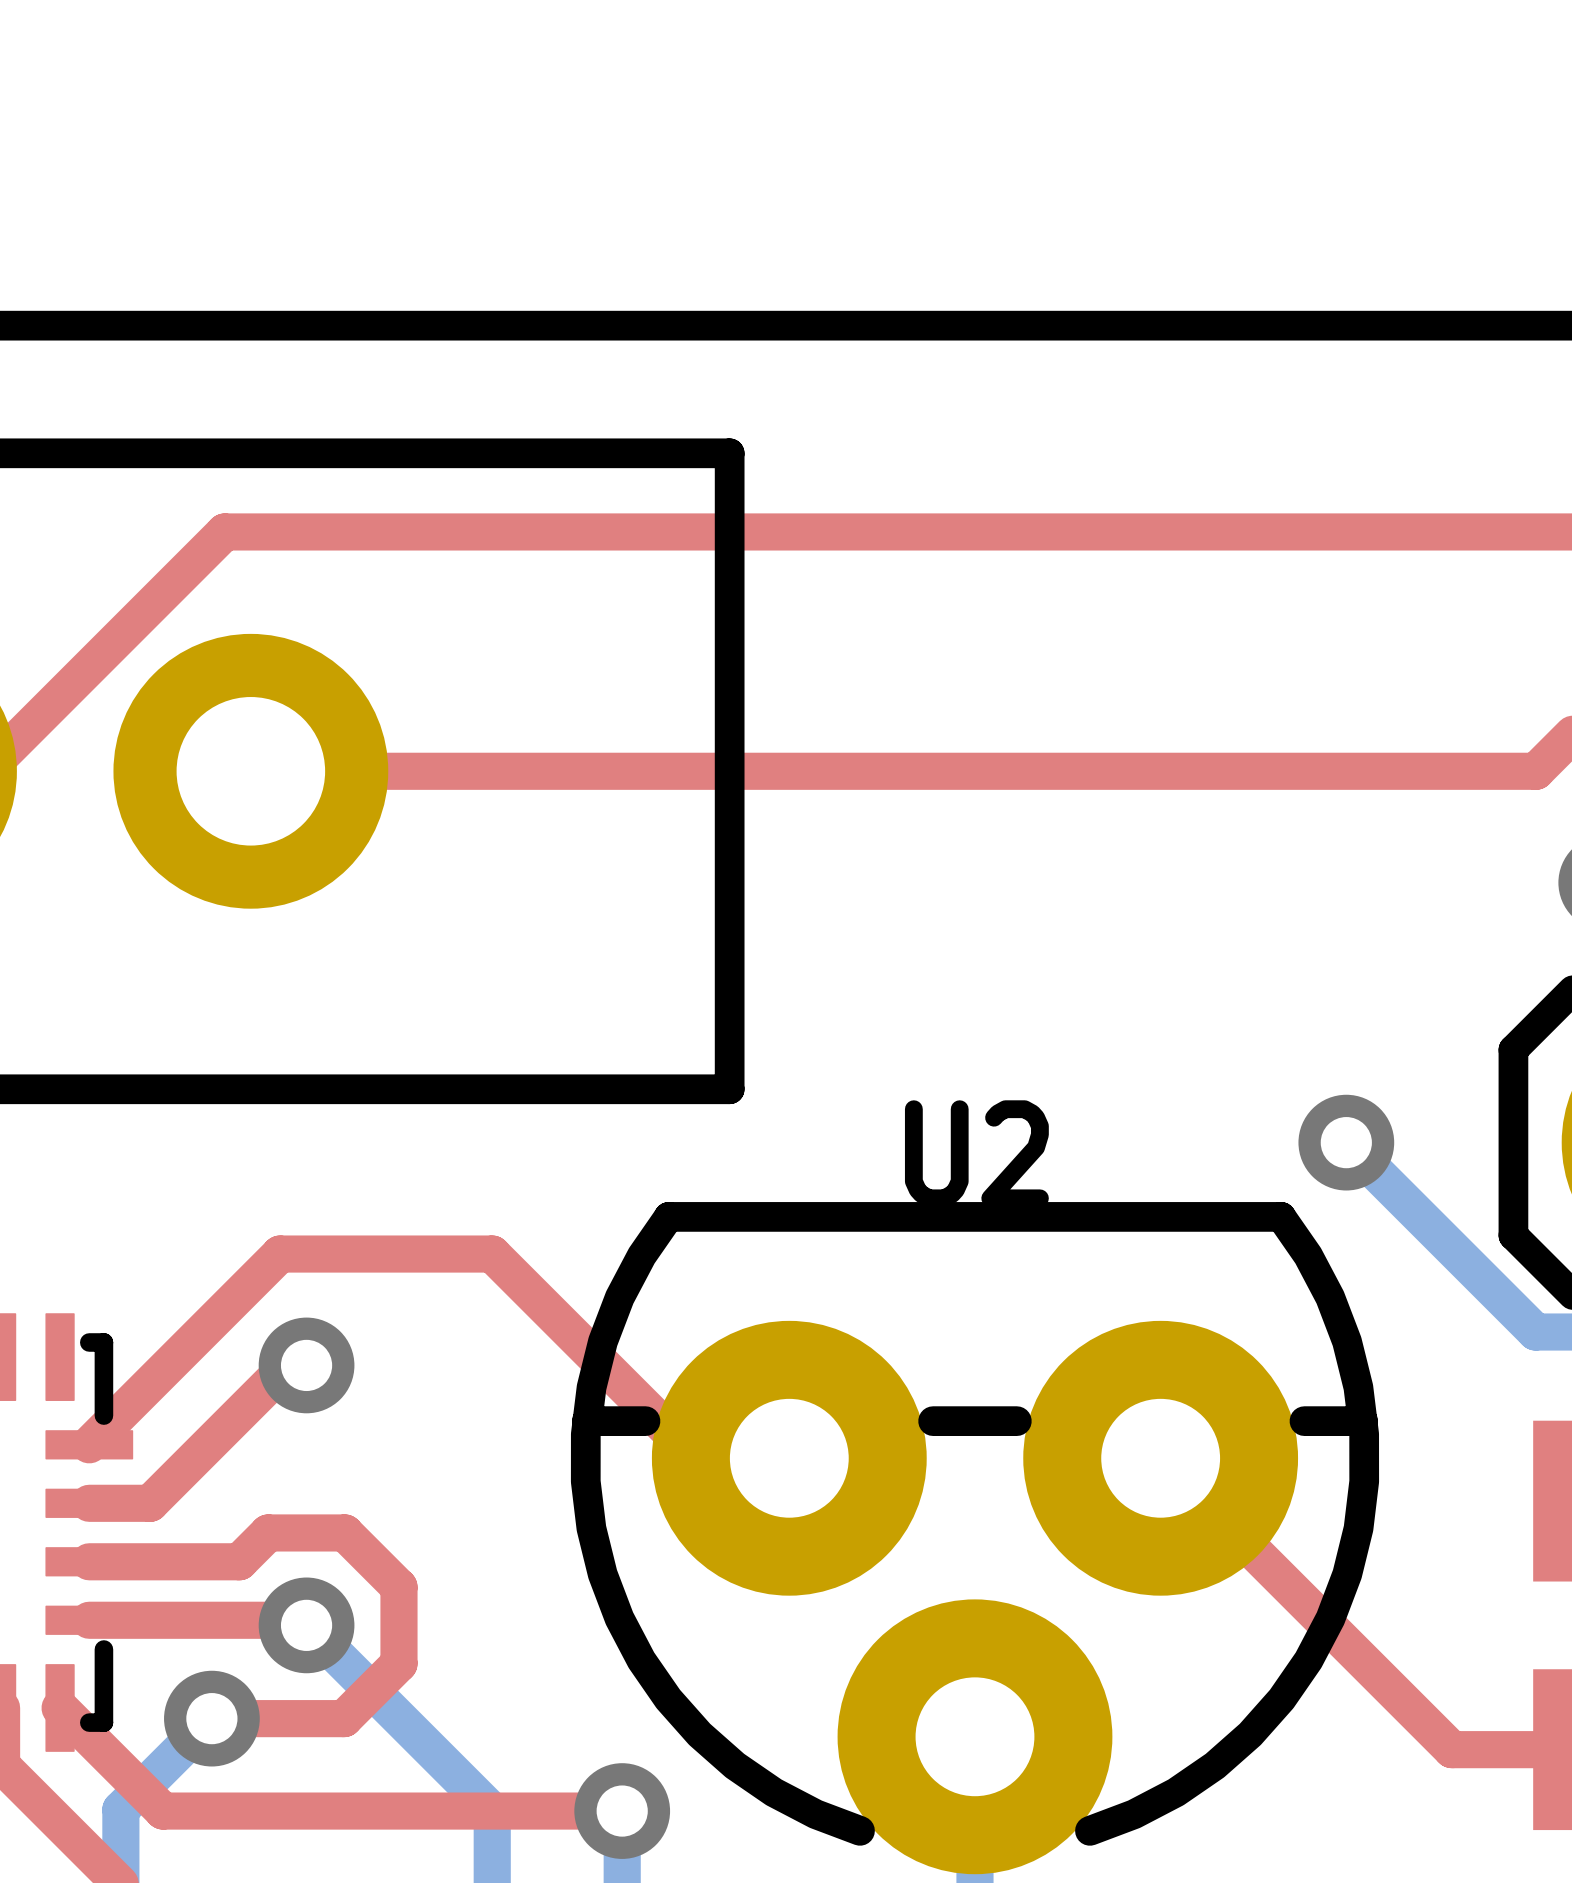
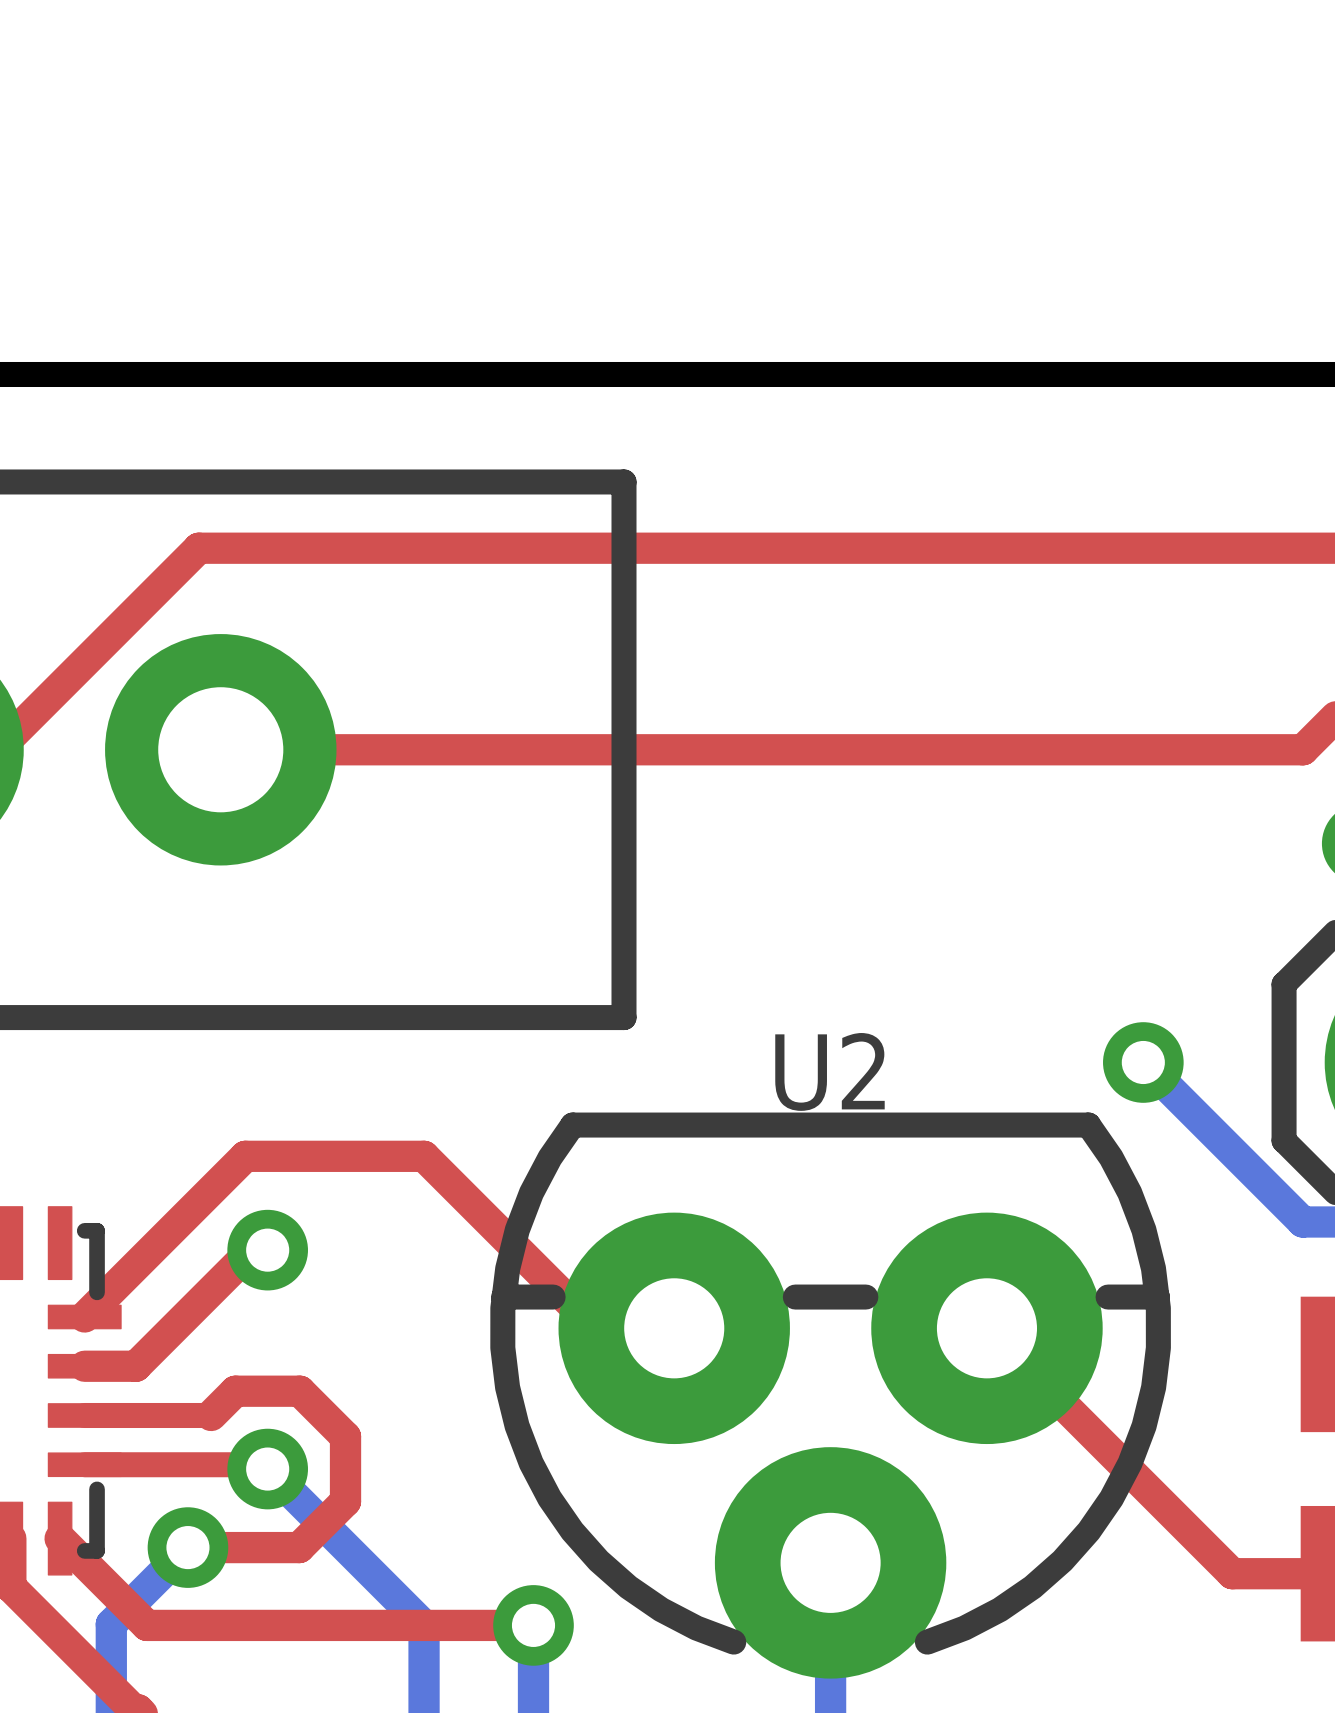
top track width: thick (89, 1561) (239, 1561) -> thin (84, 1415) (211, 1415)
top track width: thick (89, 1620) (301, 1620) -> thin (84, 1464) (263, 1464)

